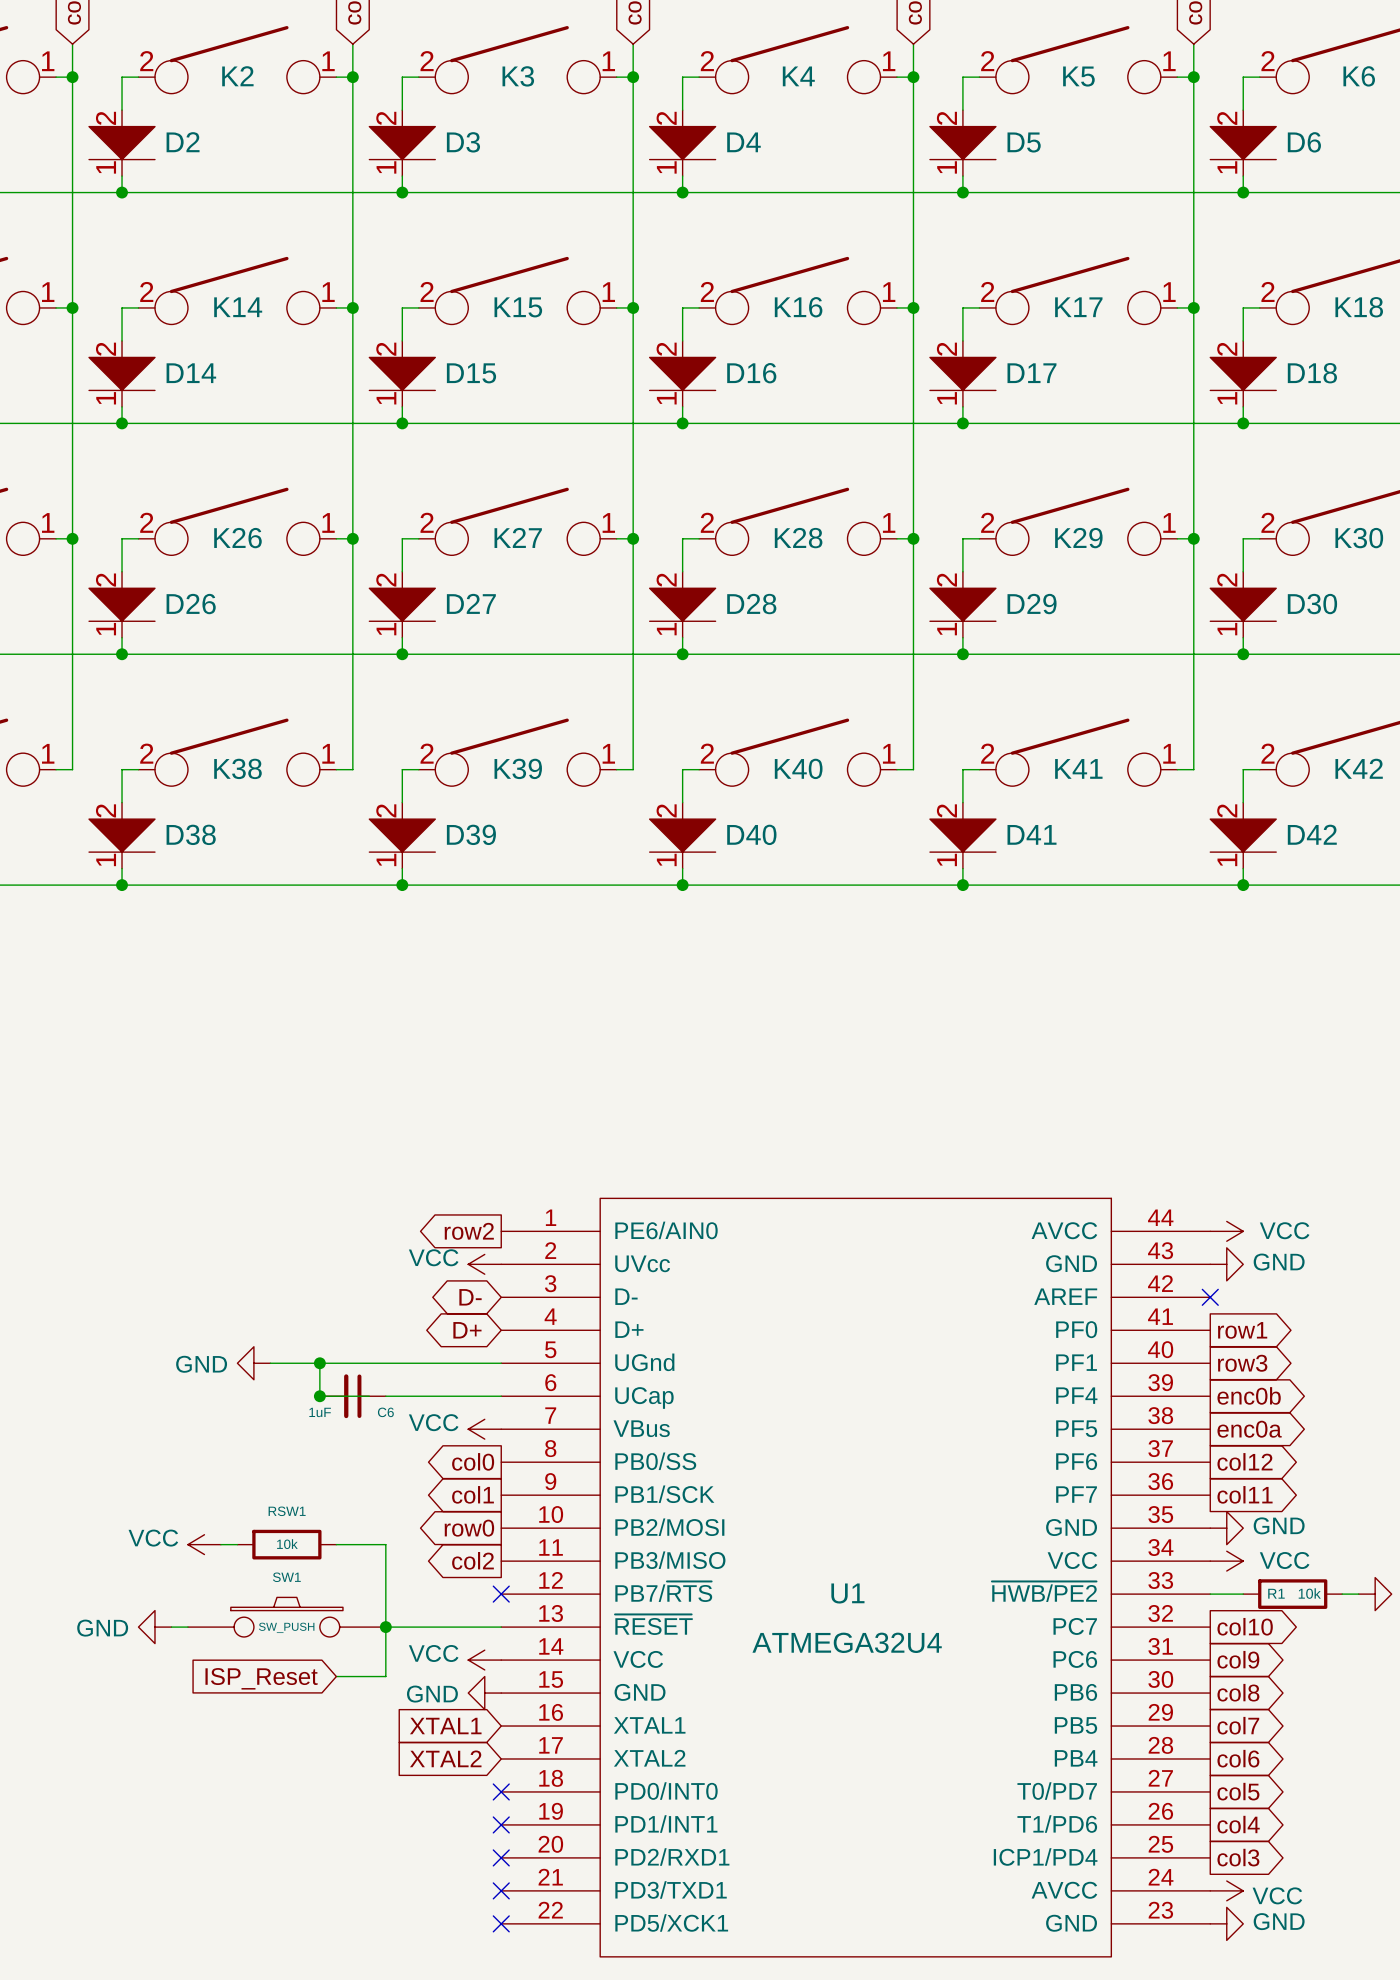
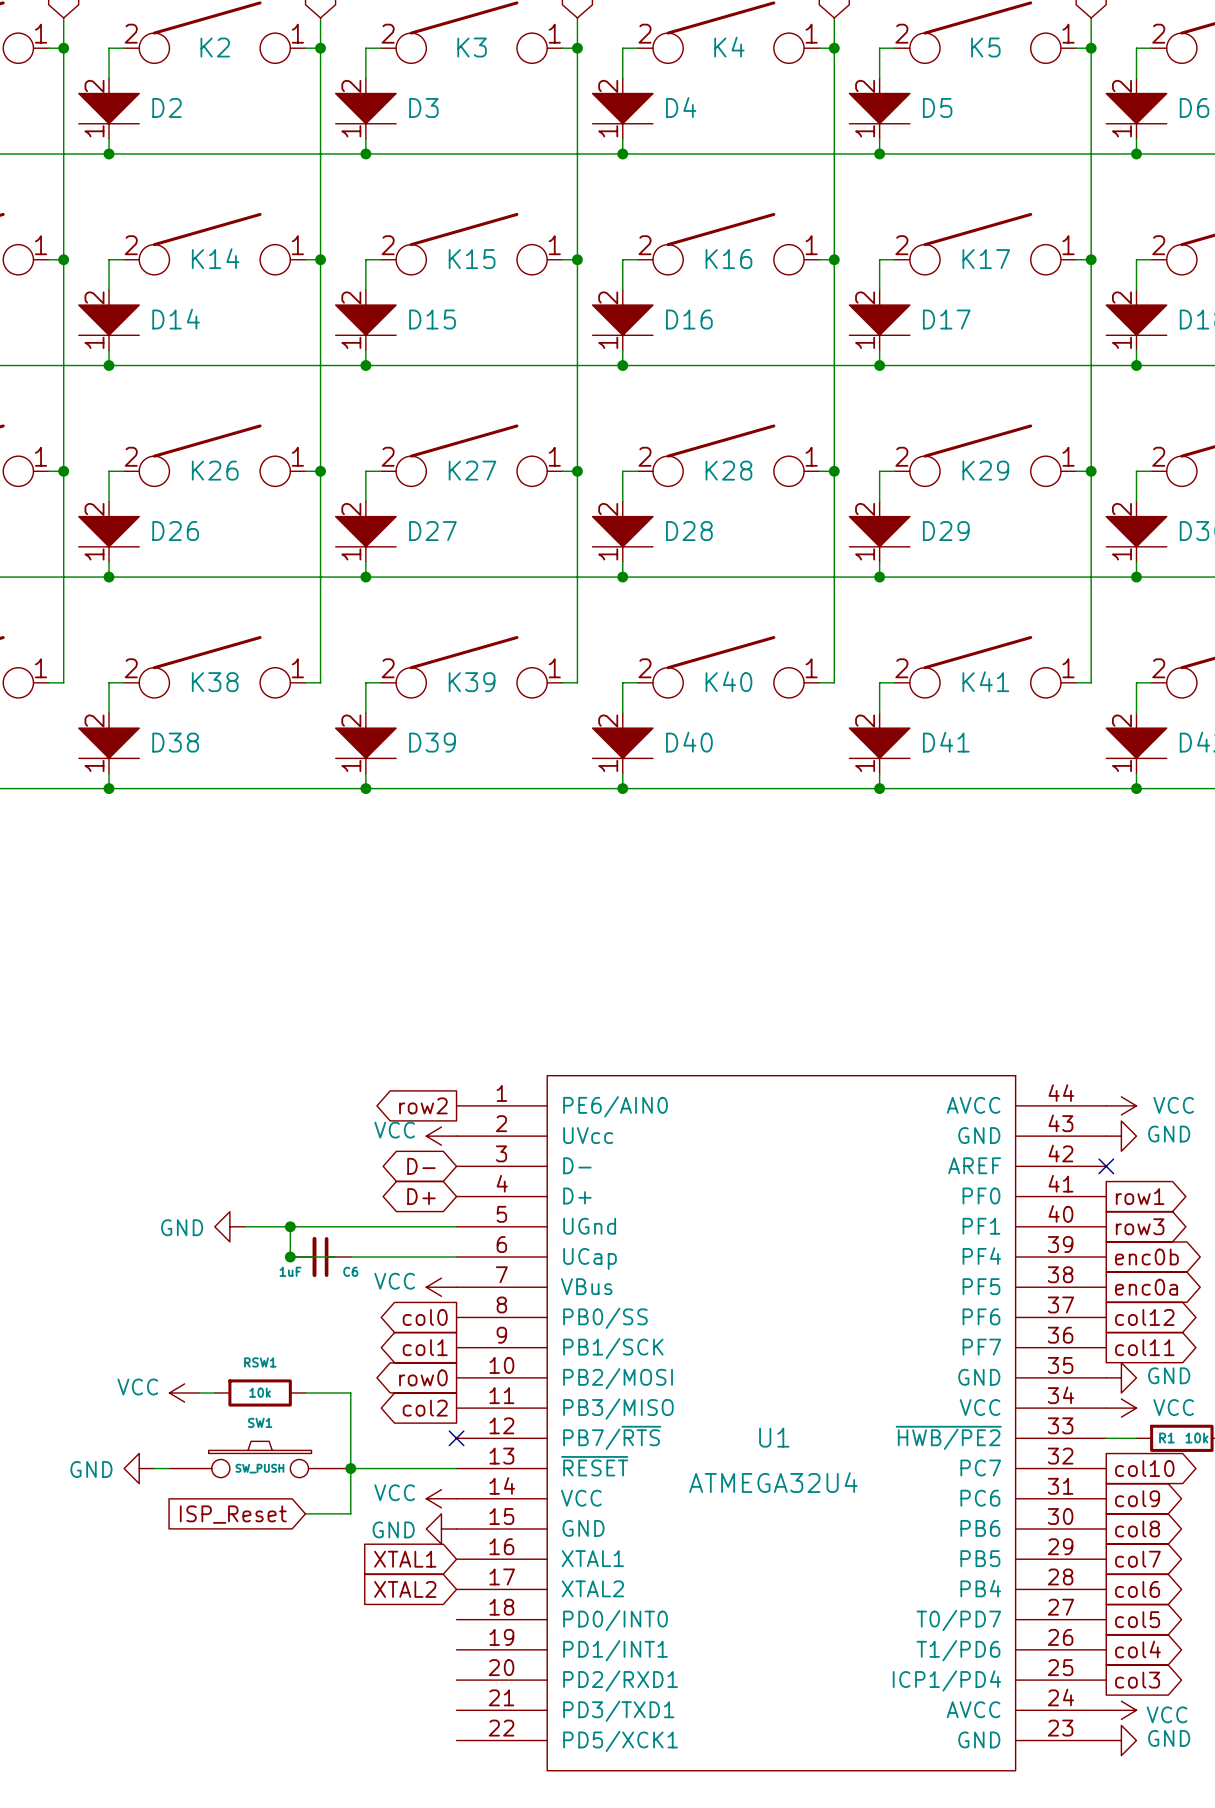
no-connect mark: (501, 1791) -> none
no-connect mark: (501, 1824) -> none
no-connect mark: (501, 1857) -> none
no-connect mark: (501, 1890) -> none
no-connect mark: (501, 1923) -> none

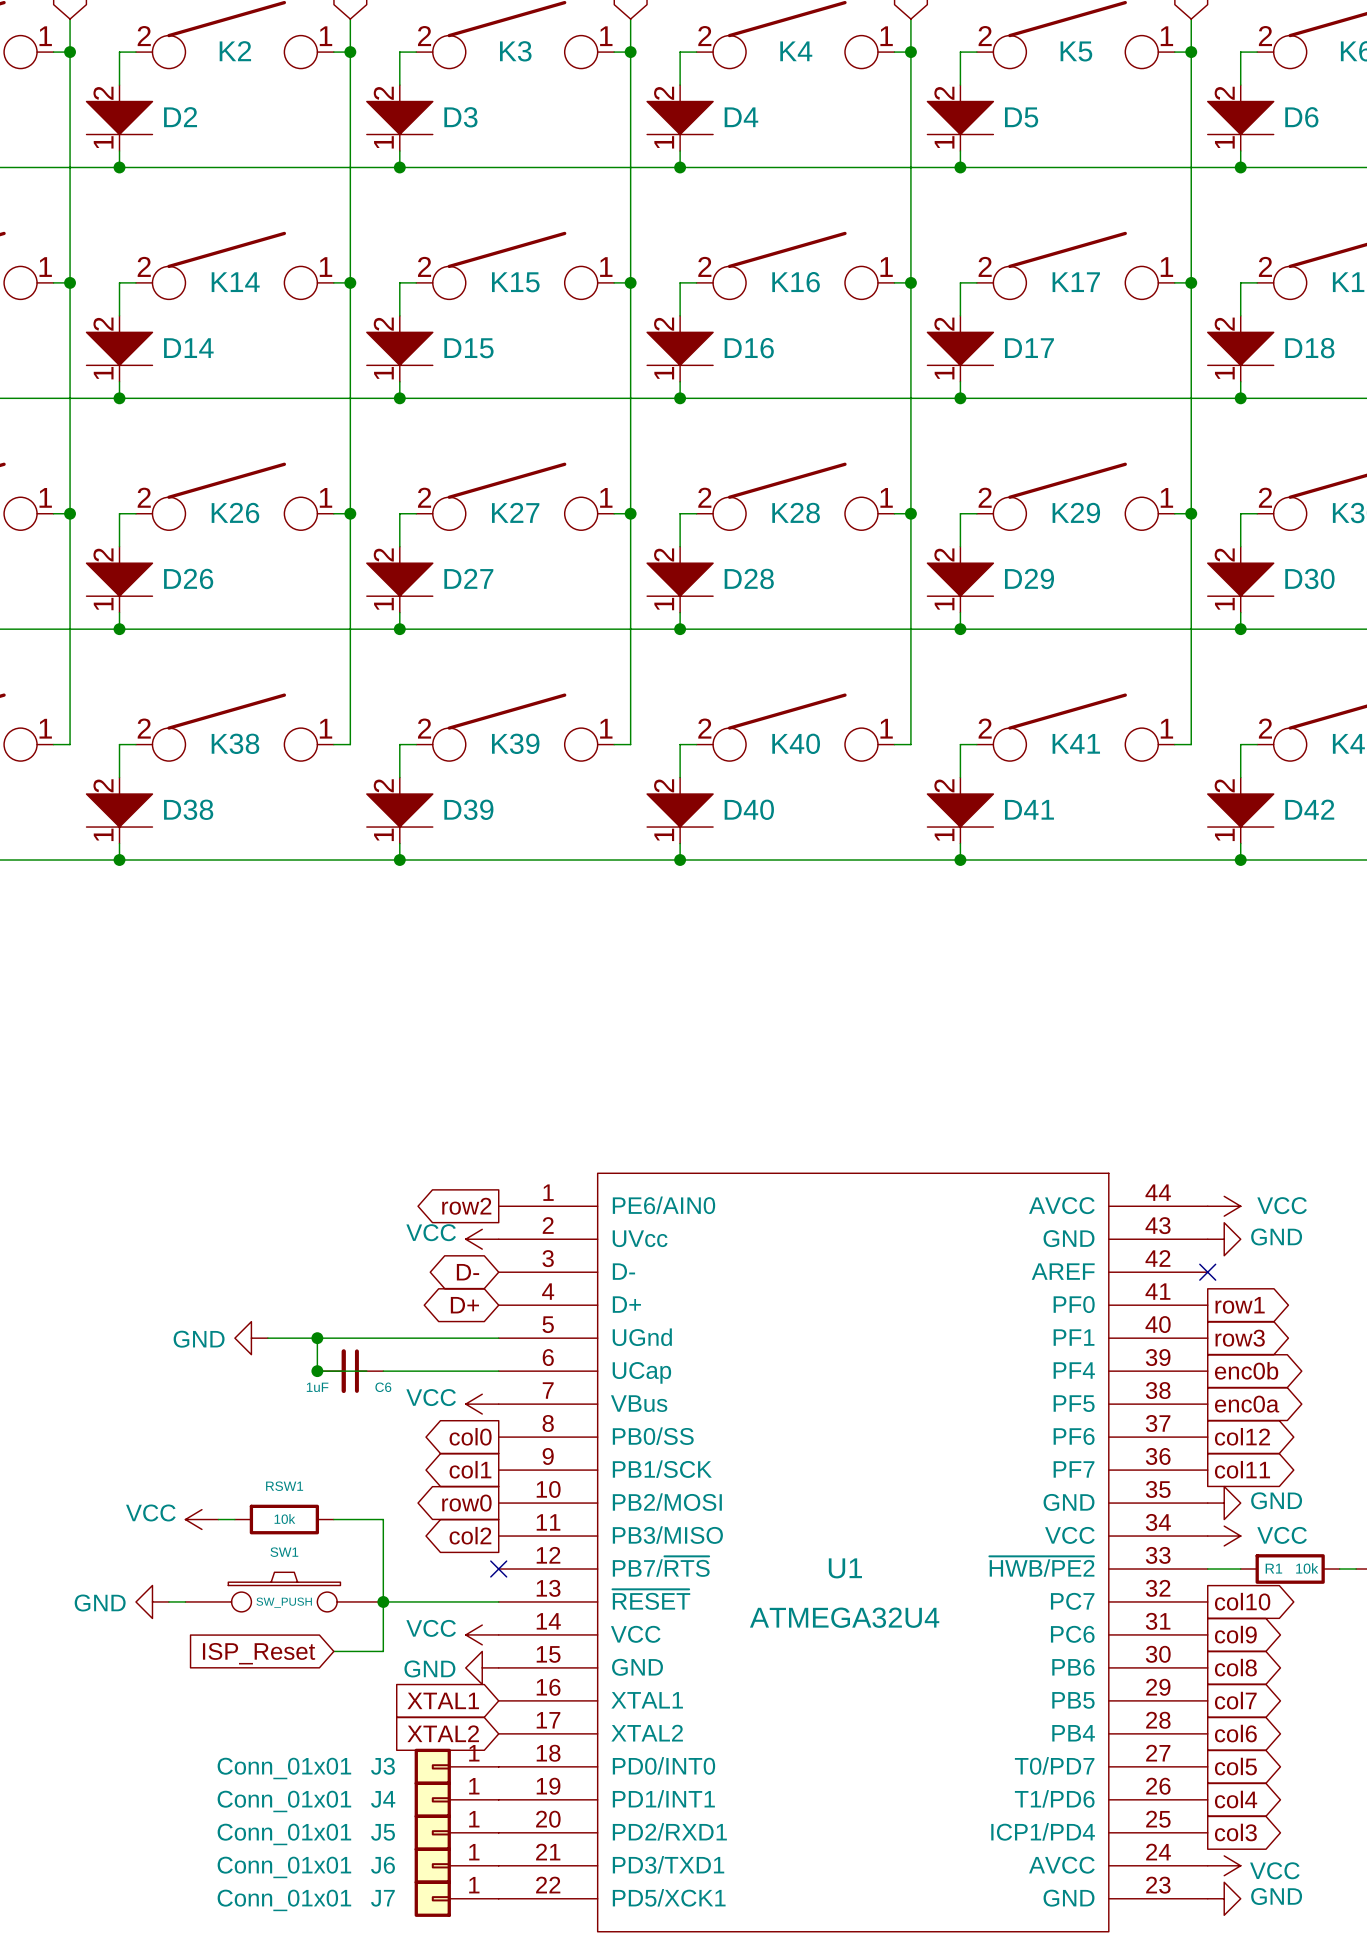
J3: none -> Conn_01x01 (456, 1766)
J4: none -> Conn_01x01 (456, 1799)
J5: none -> Conn_01x01 (456, 1832)
J6: none -> Conn_01x01 (456, 1865)
J7: none -> Conn_01x01 (456, 1898)

